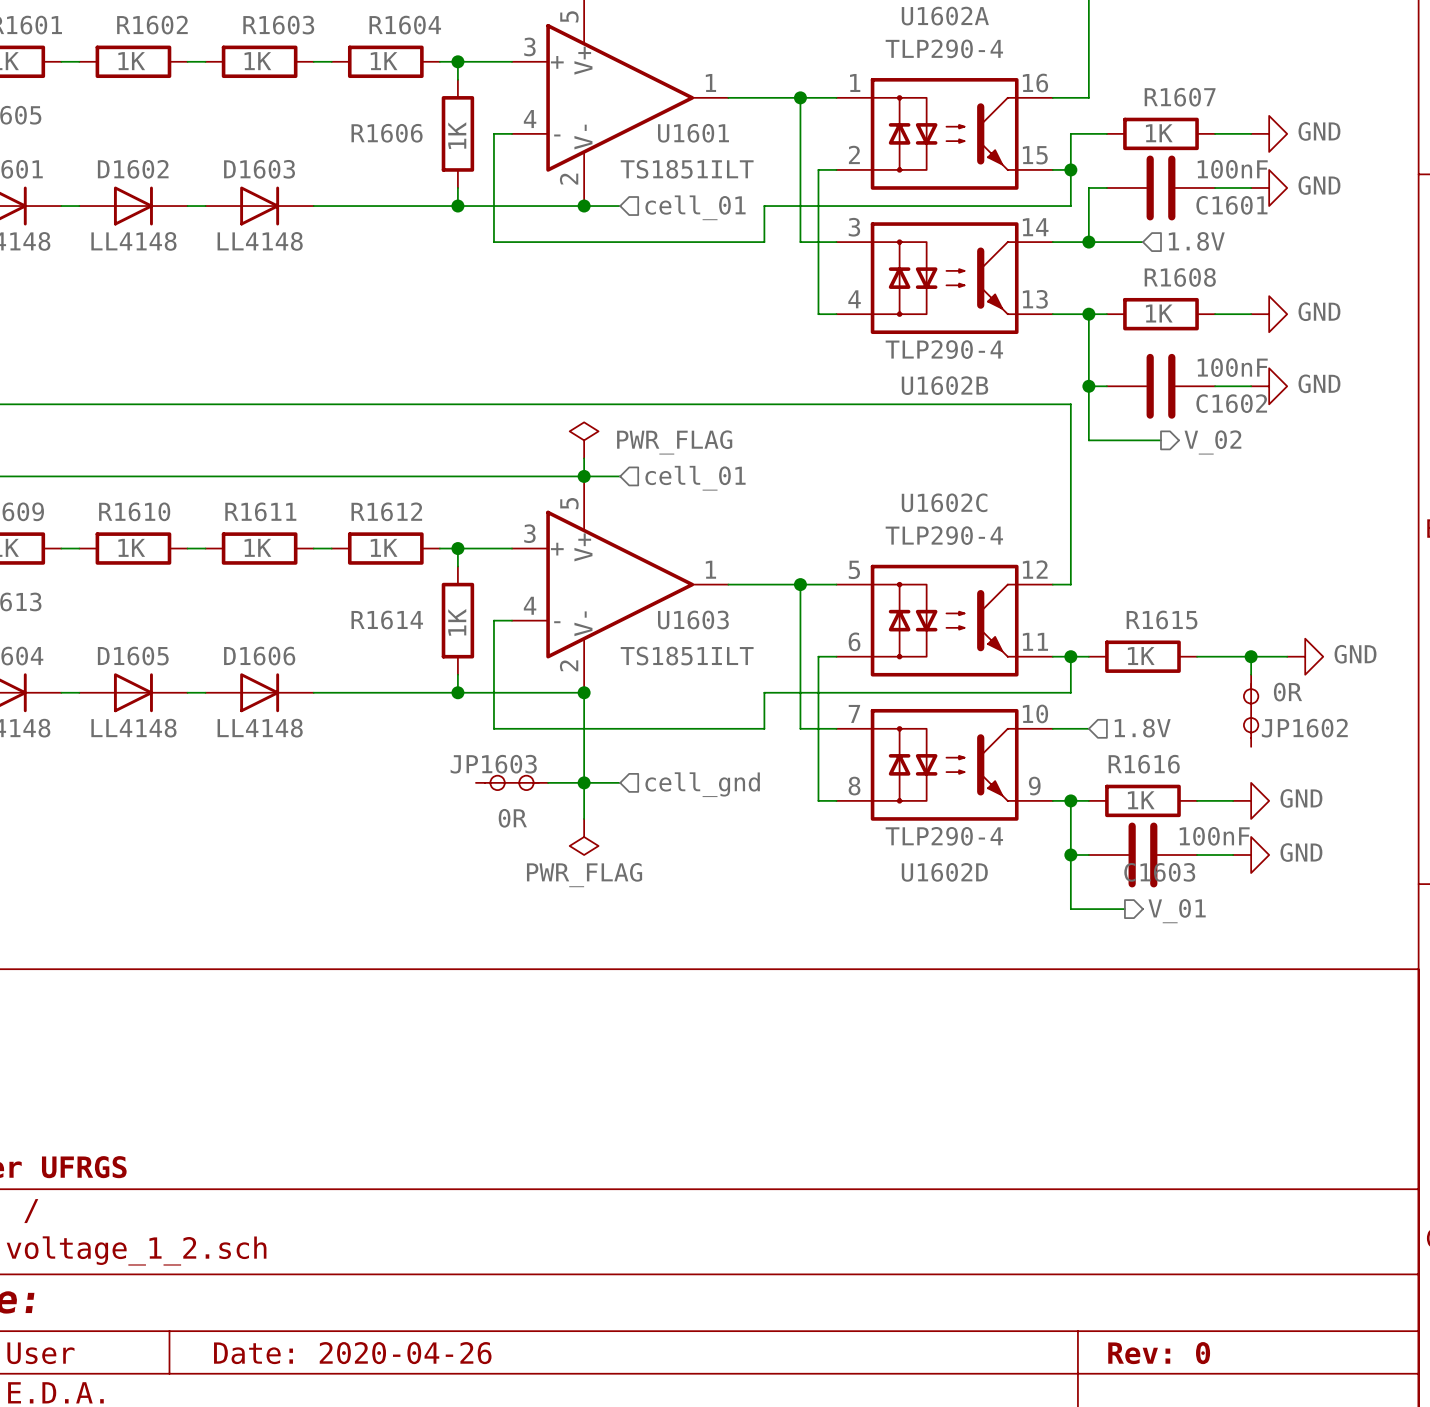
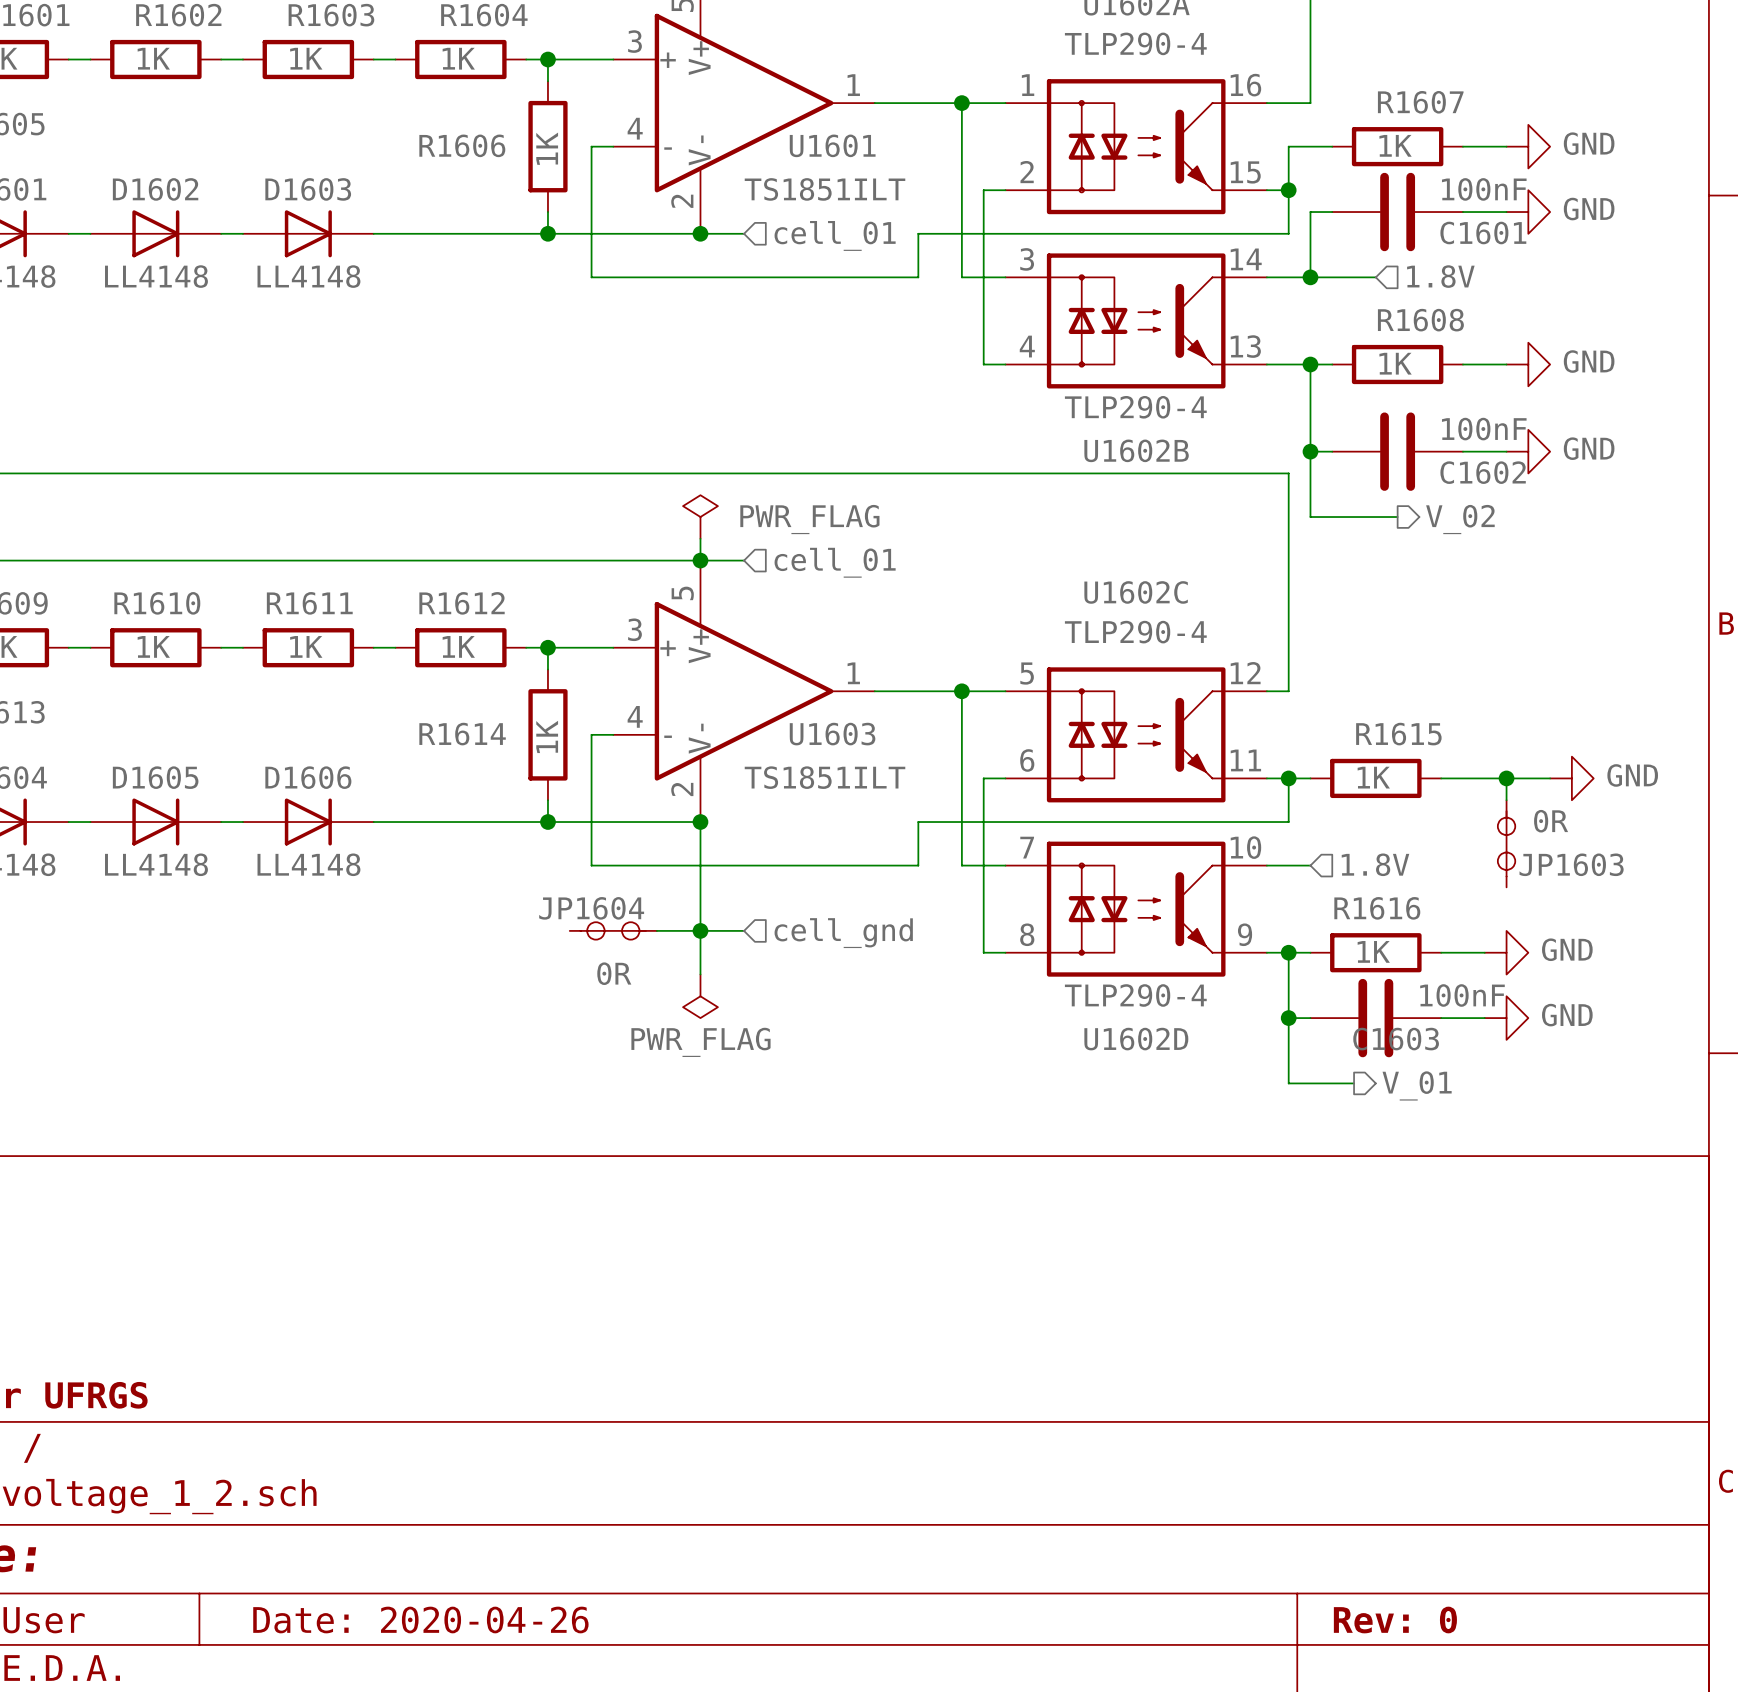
JP1602 name: JP1602 (1304, 728) -> JP1603 (1571, 864)
JP1603 name: JP1603 (493, 764) -> JP1604 (591, 908)

